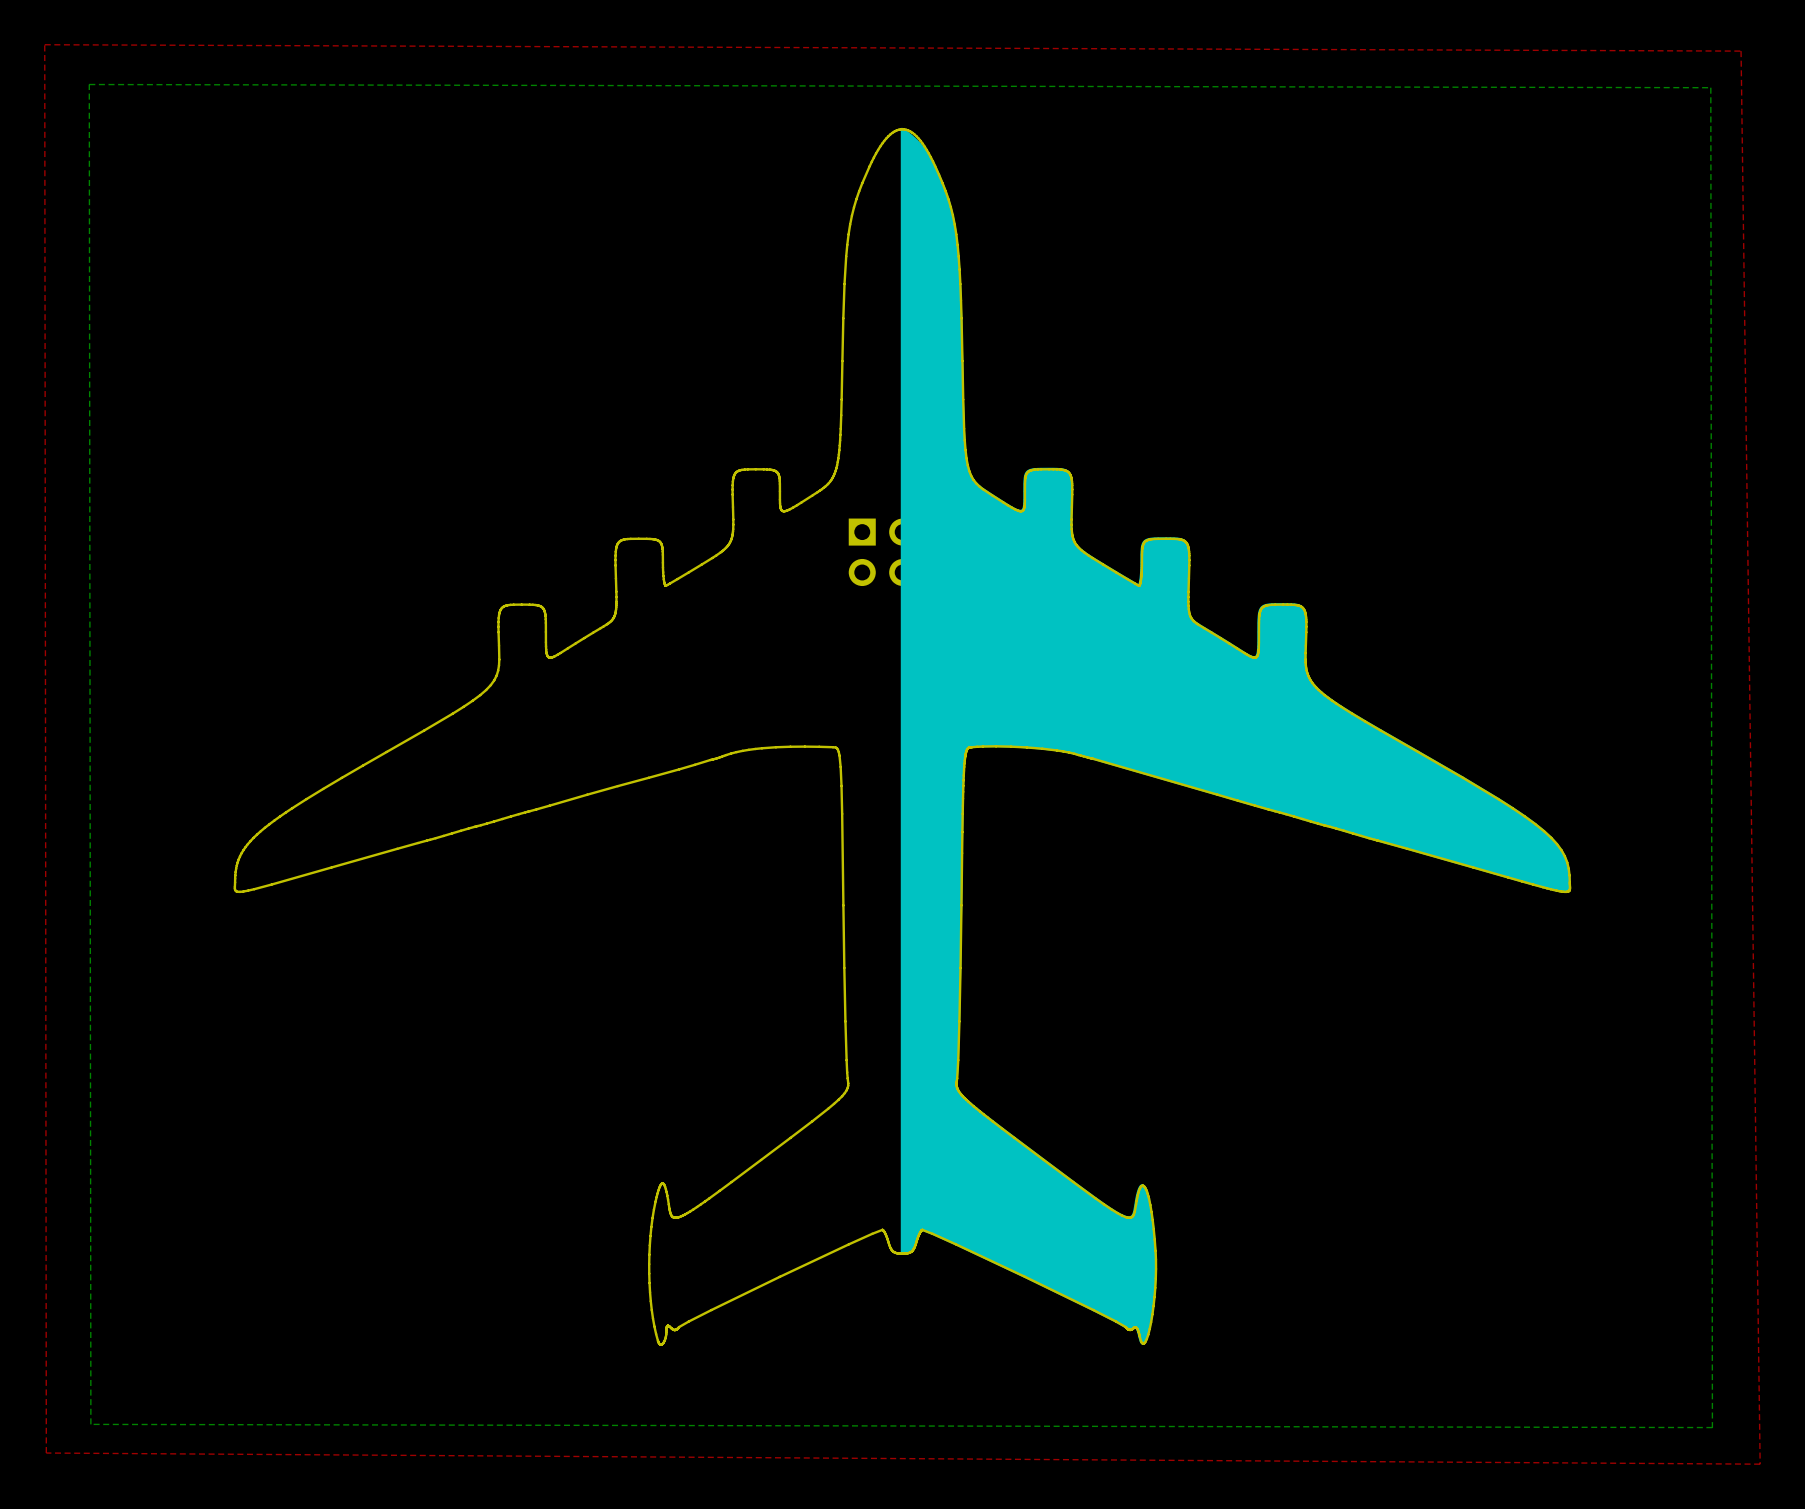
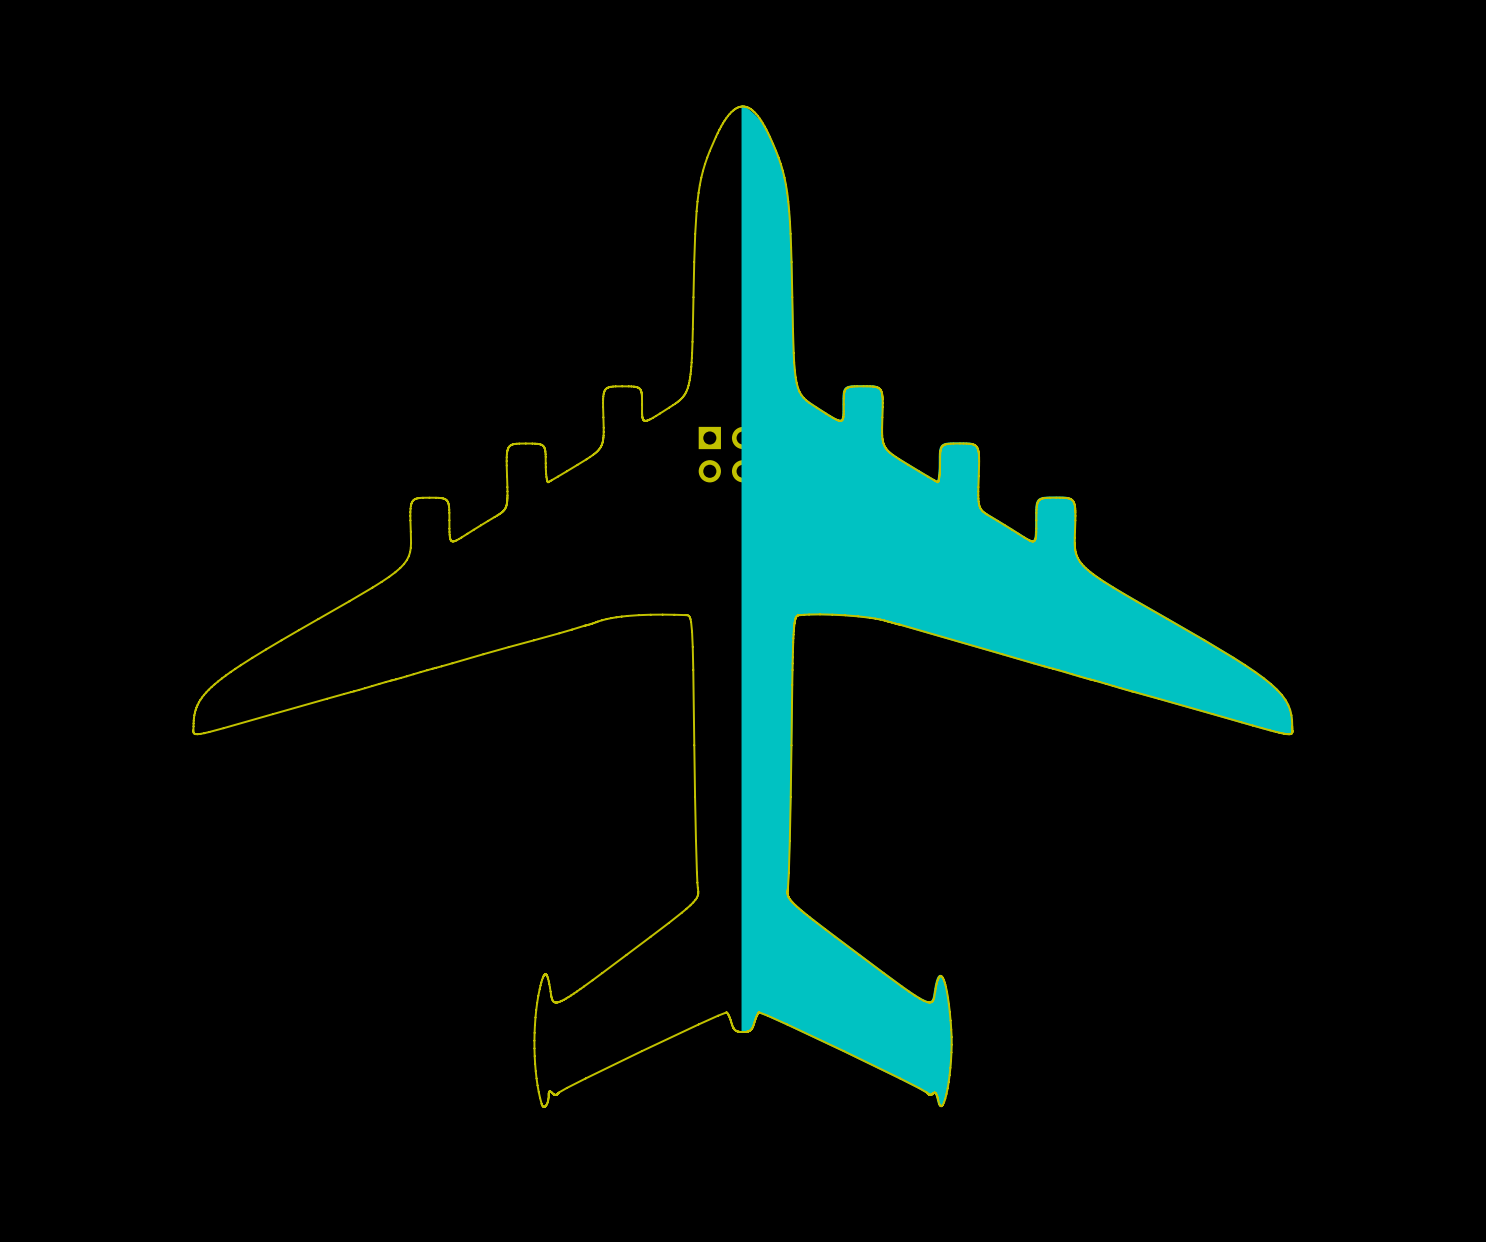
top zone outline: (44, 44) (46, 1453) (1760, 1464) (1741, 51) (44, 44) -> none
bottom zone outline: (89, 84) (90, 1424) (1712, 1427) (1710, 87) (89, 84) -> none

